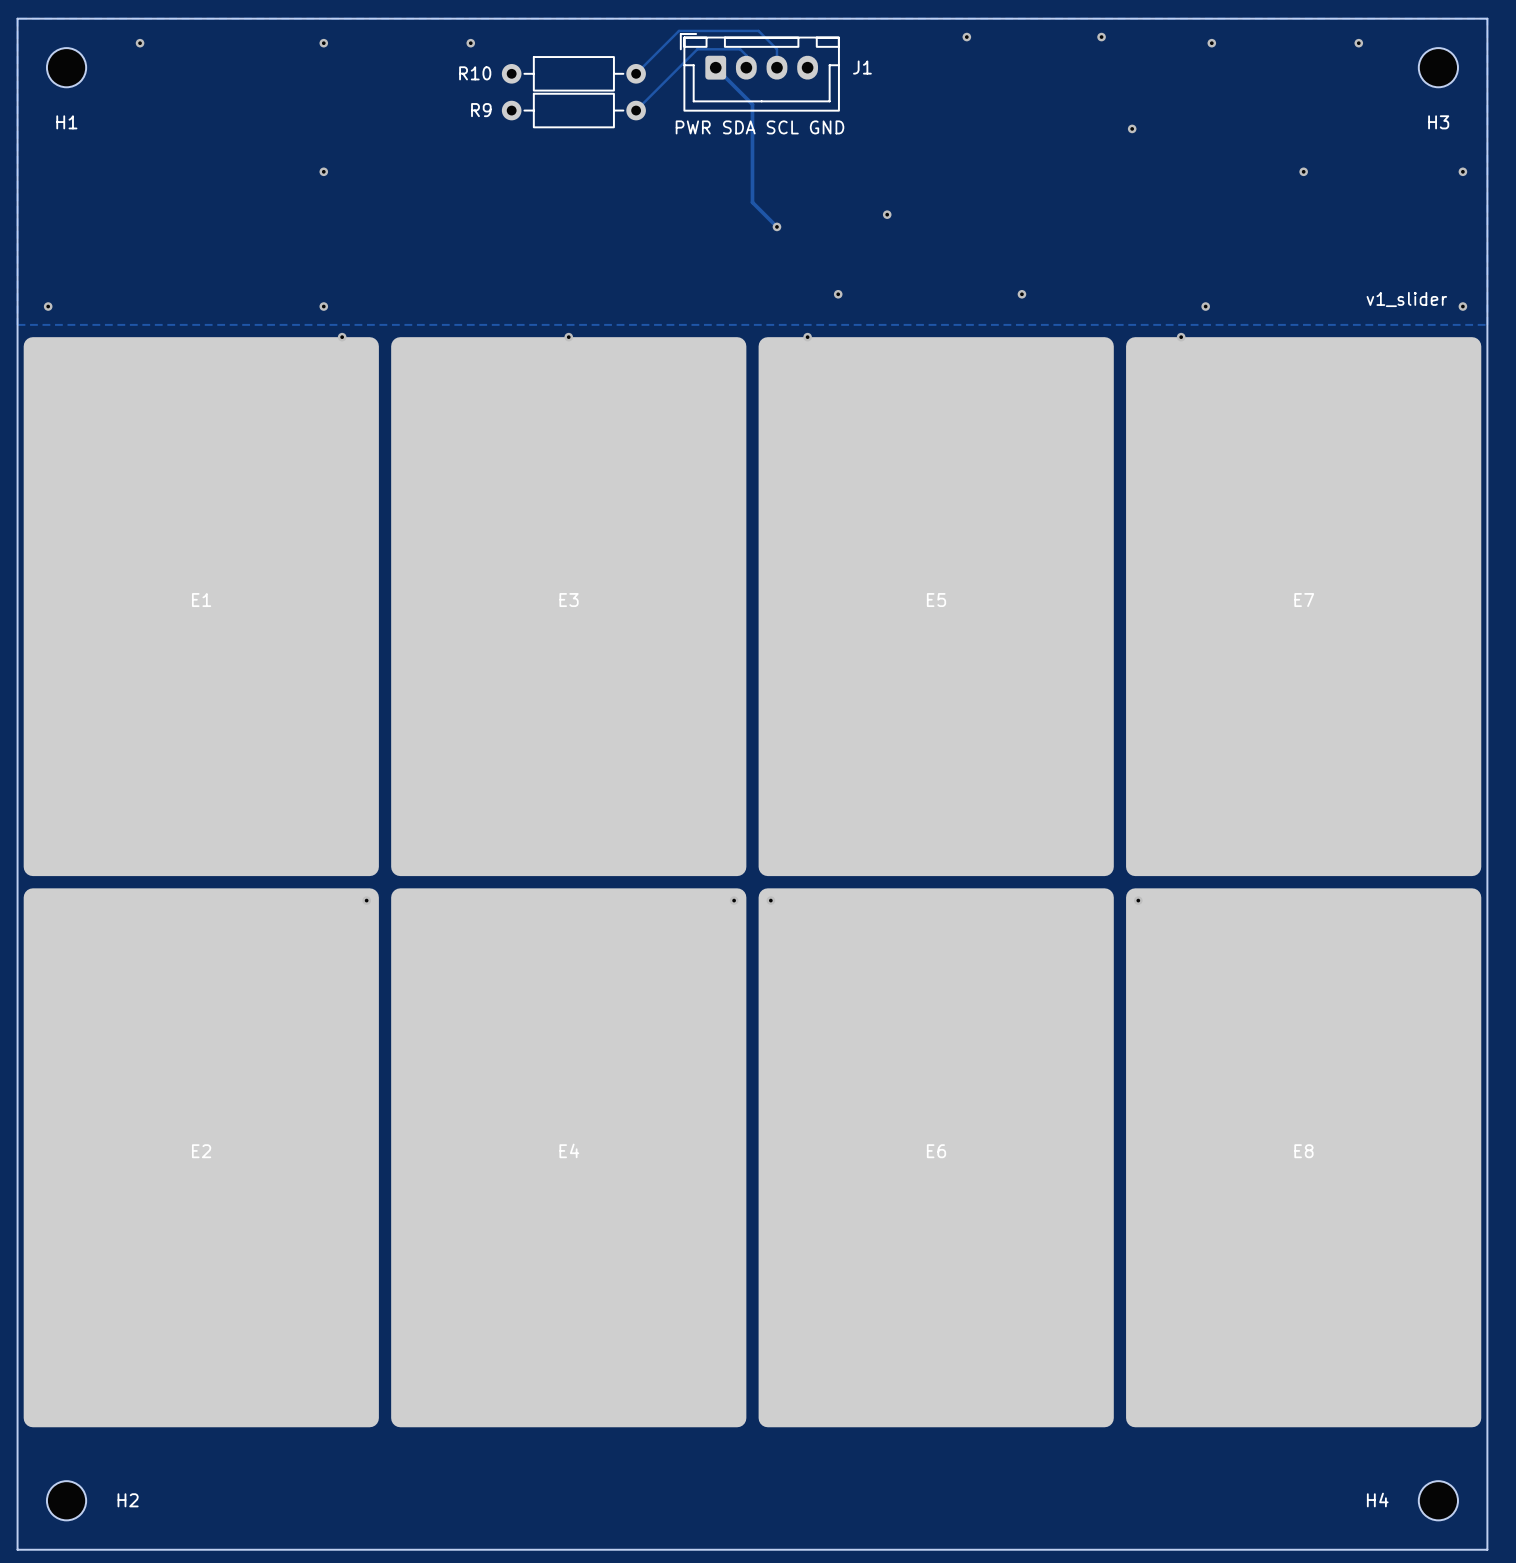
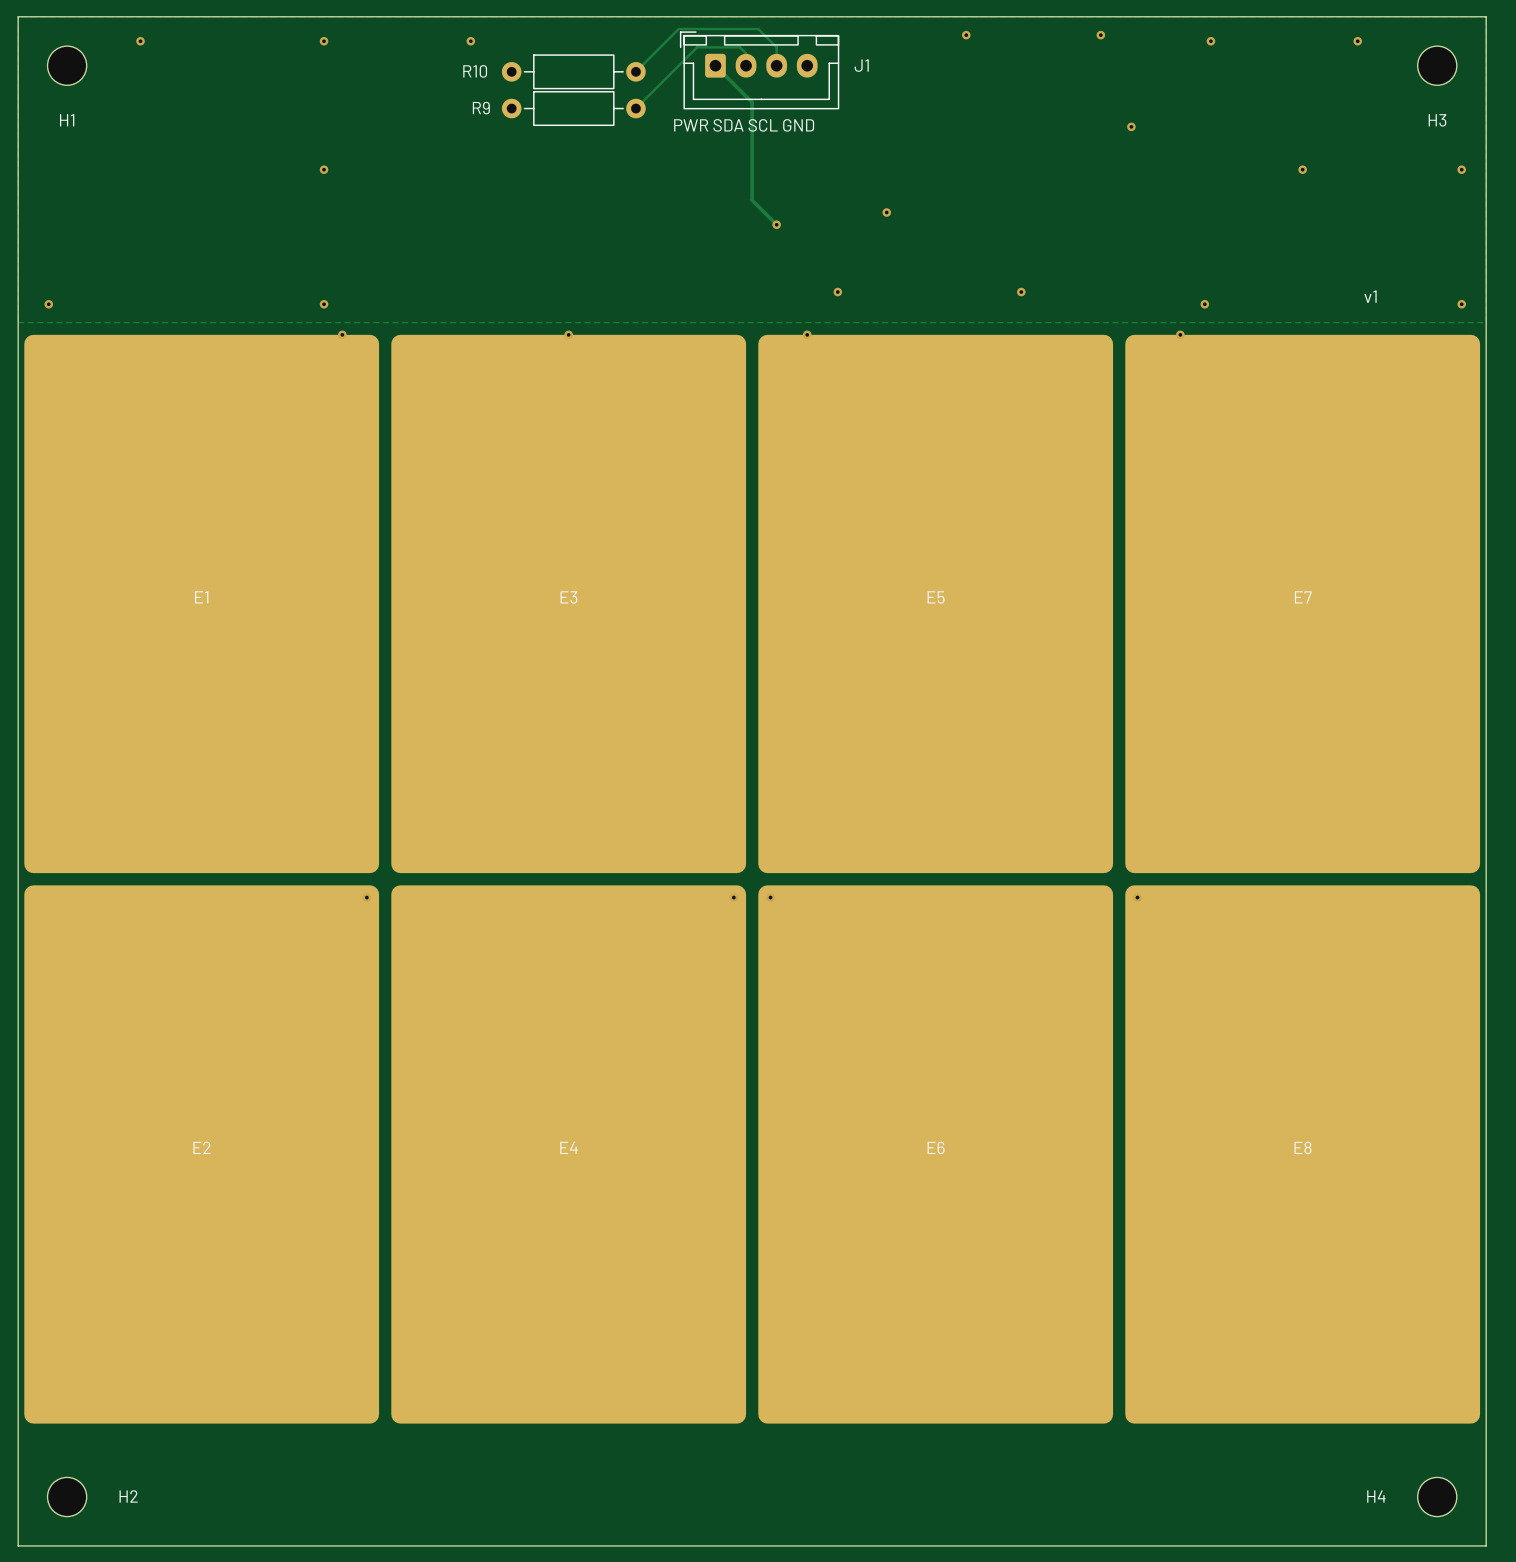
text: v1_slider (1406, 299) -> v1 (1370, 296)

